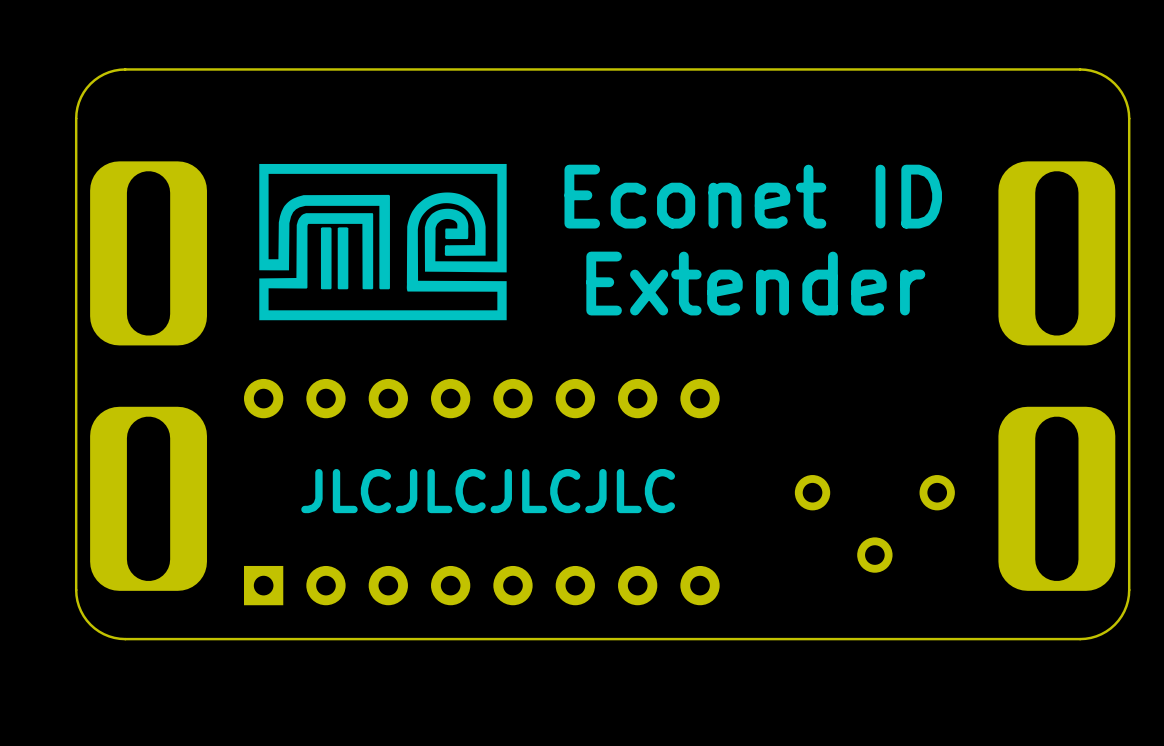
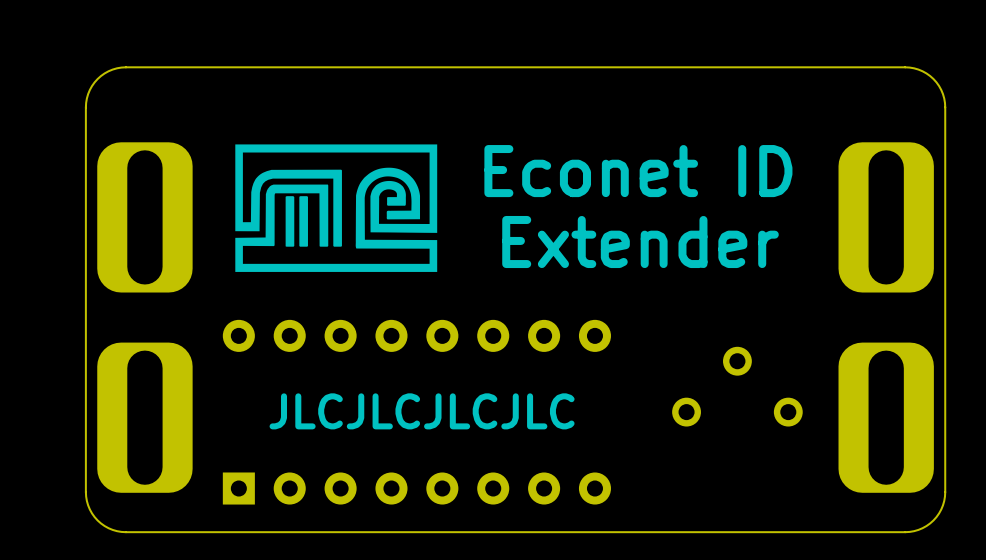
part rotation: 0° (874, 523) -> 180° (737, 386)

